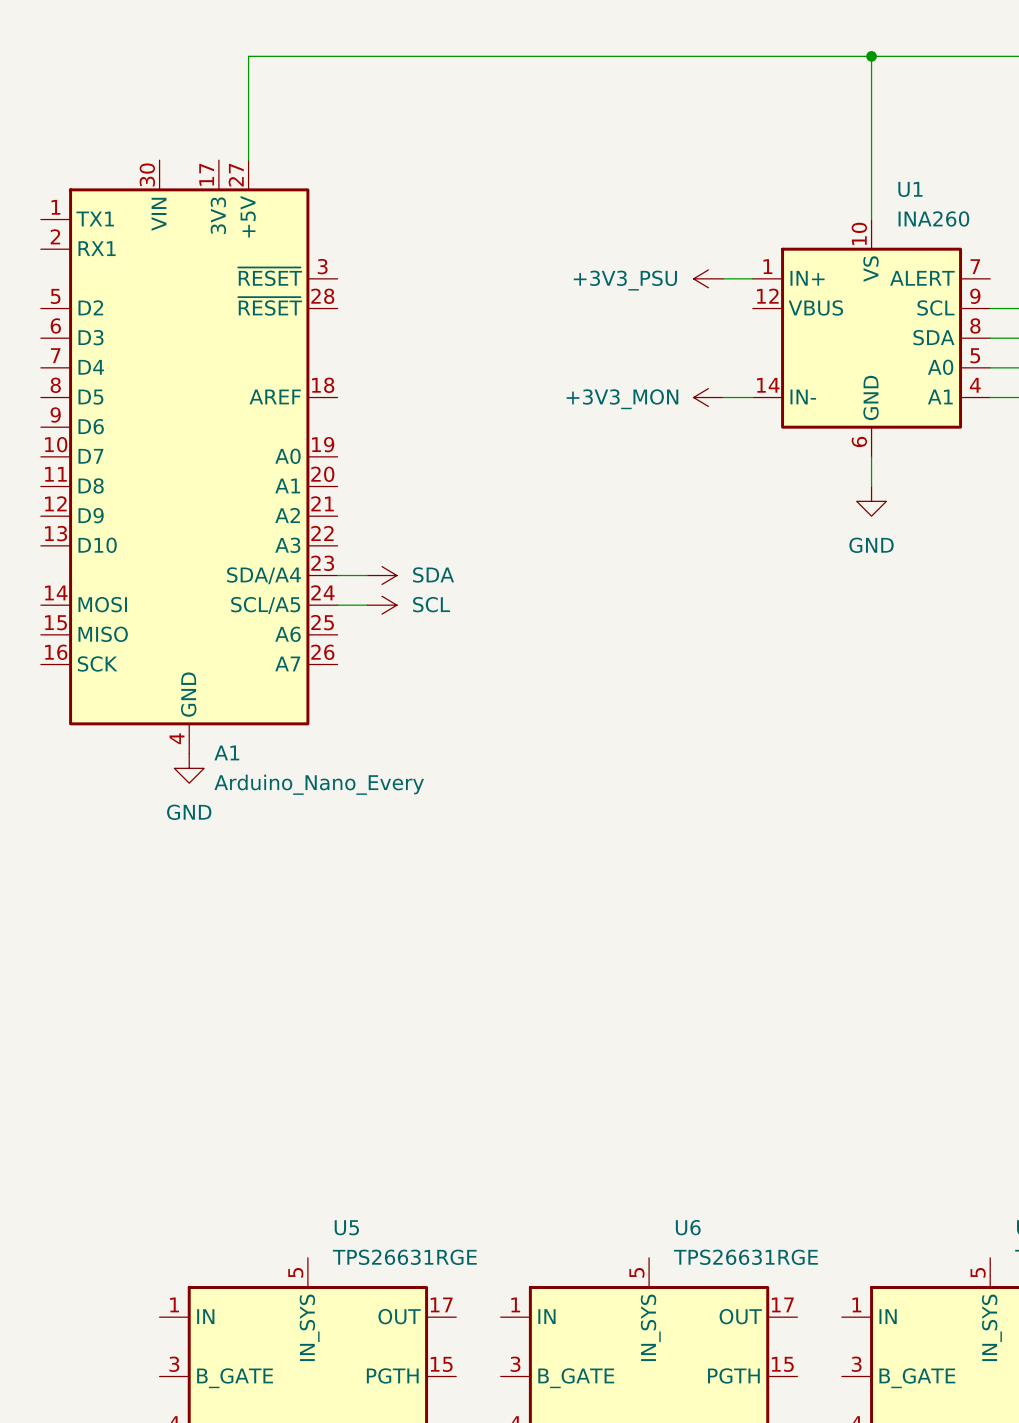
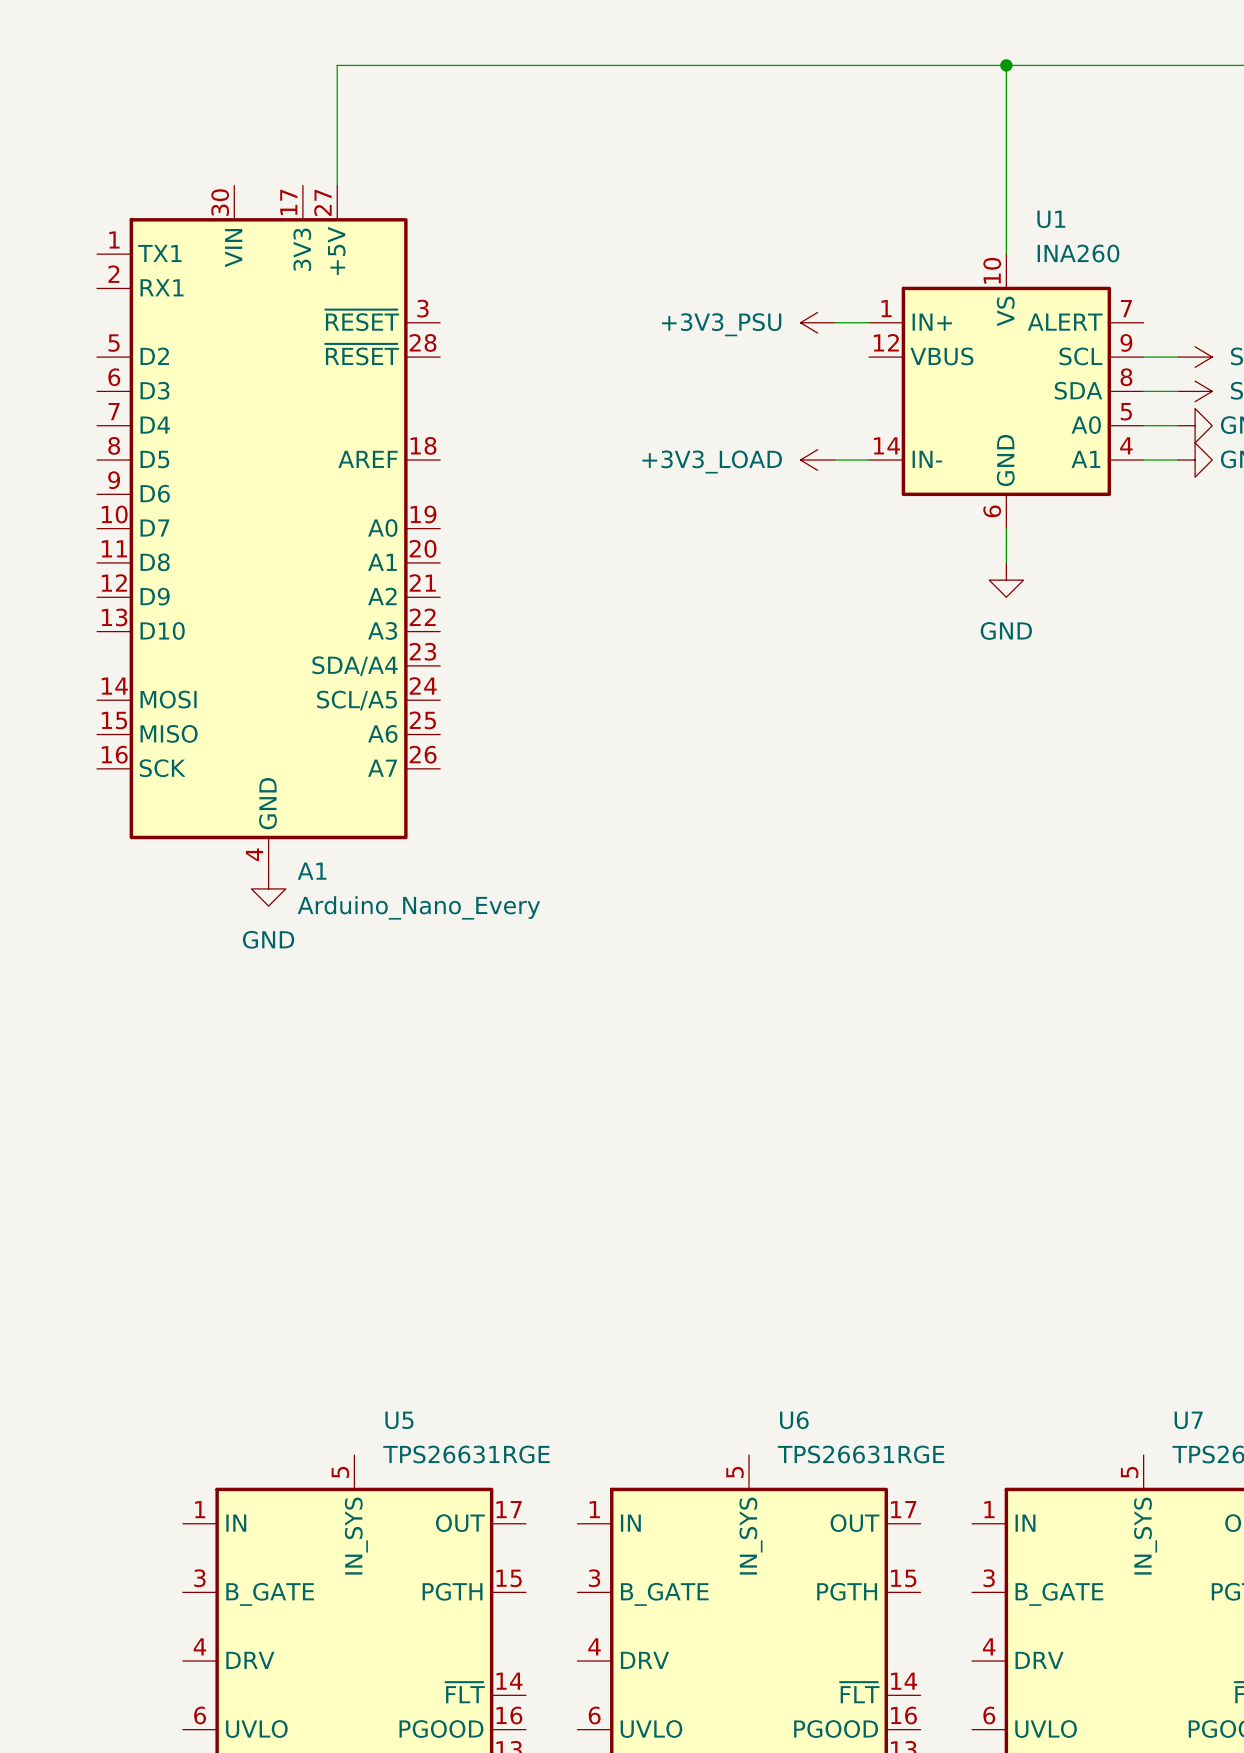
wire: (293, 56) (248, 56) (248, 160) -> (337, 65) (337, 185)
power symbol: +3V3_MON (708, 397) -> +3V3_LOAD (817, 460)
A1 position: (189, 456) -> (268, 528)
power symbol: SDA (382, 575) -> none
power symbol: SCL (382, 605) -> none
power symbol position: GND (189, 768) -> GND (268, 888)

